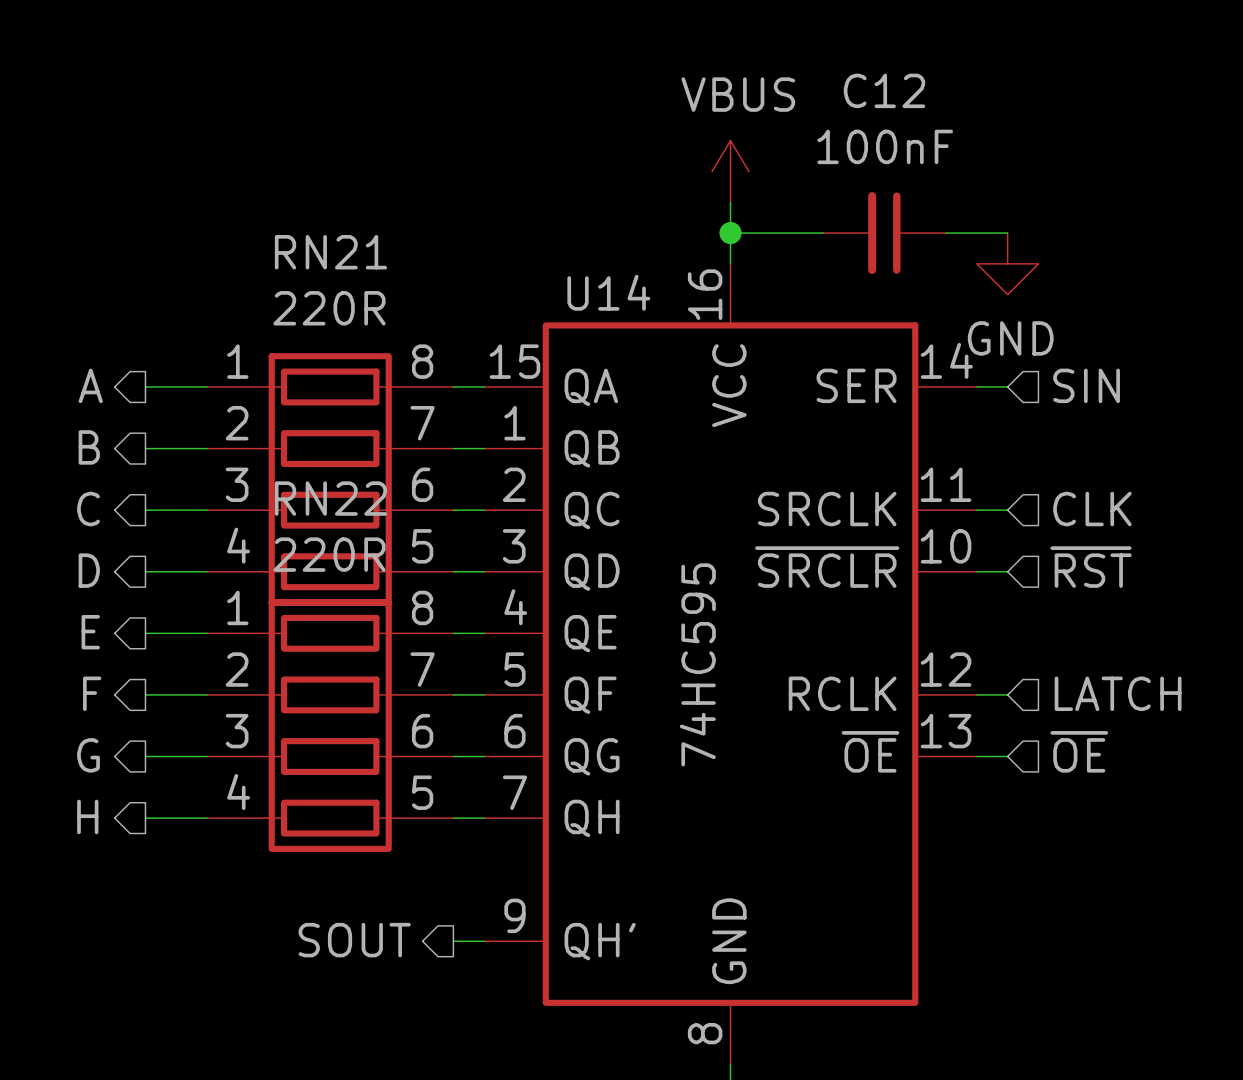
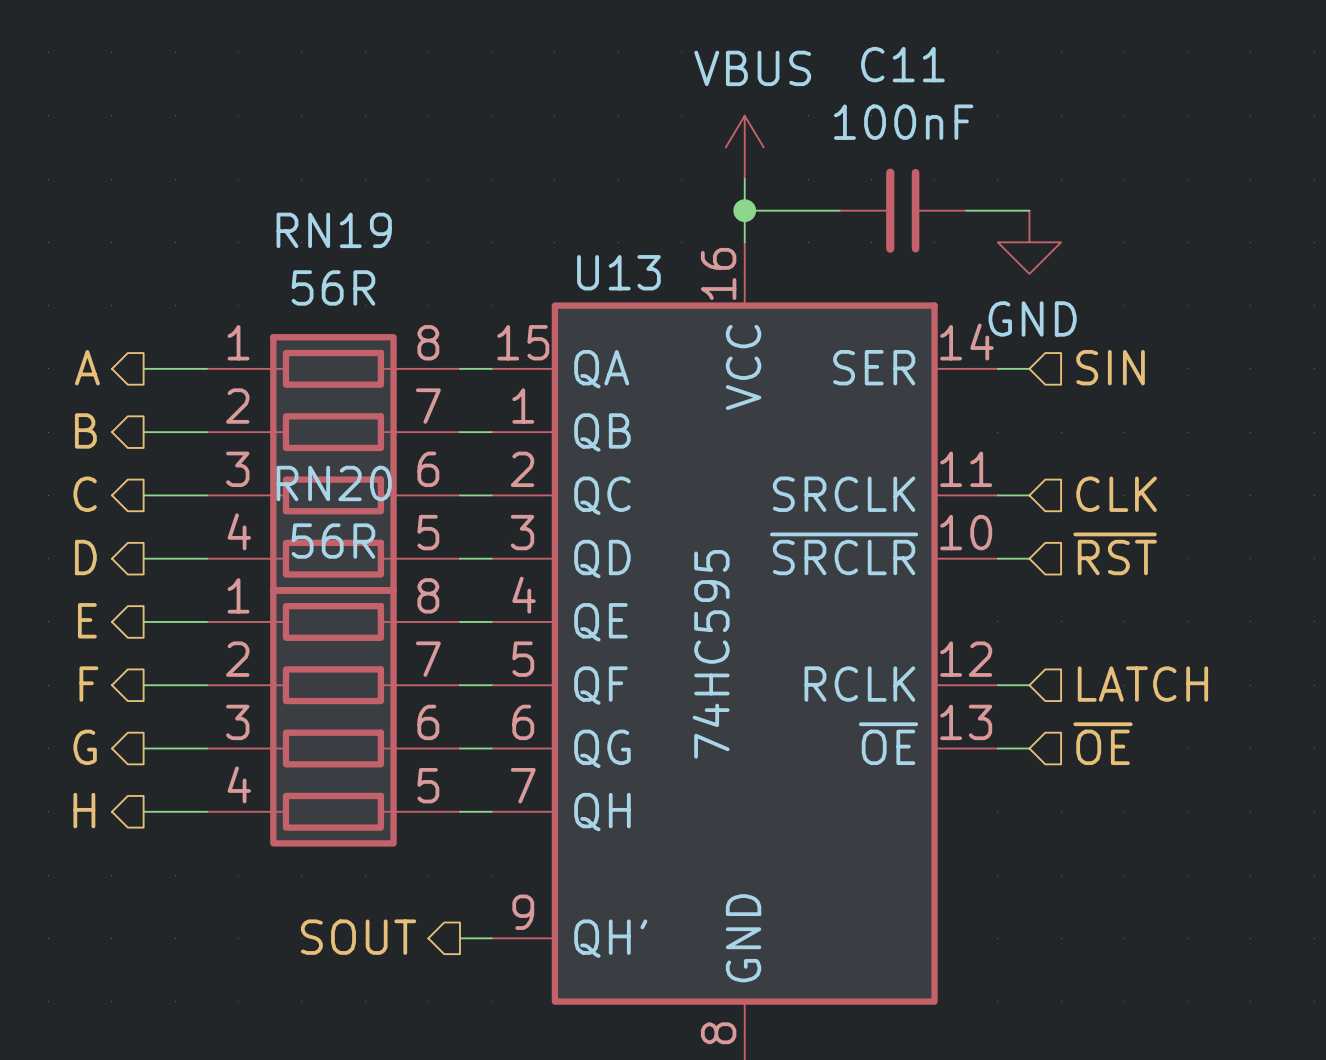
C12 name: C12 (884, 90) -> C11 (902, 64)
RN21 name: RN21 (330, 252) -> RN19 (334, 230)
U14 name: U14 (608, 292) -> U13 (618, 272)
RN21 value: 220R (329, 308) -> 56R (333, 287)
RN22 name: RN22 (330, 498) -> RN20 (334, 483)
RN22 value: 220R (329, 554) -> 56R (333, 541)

